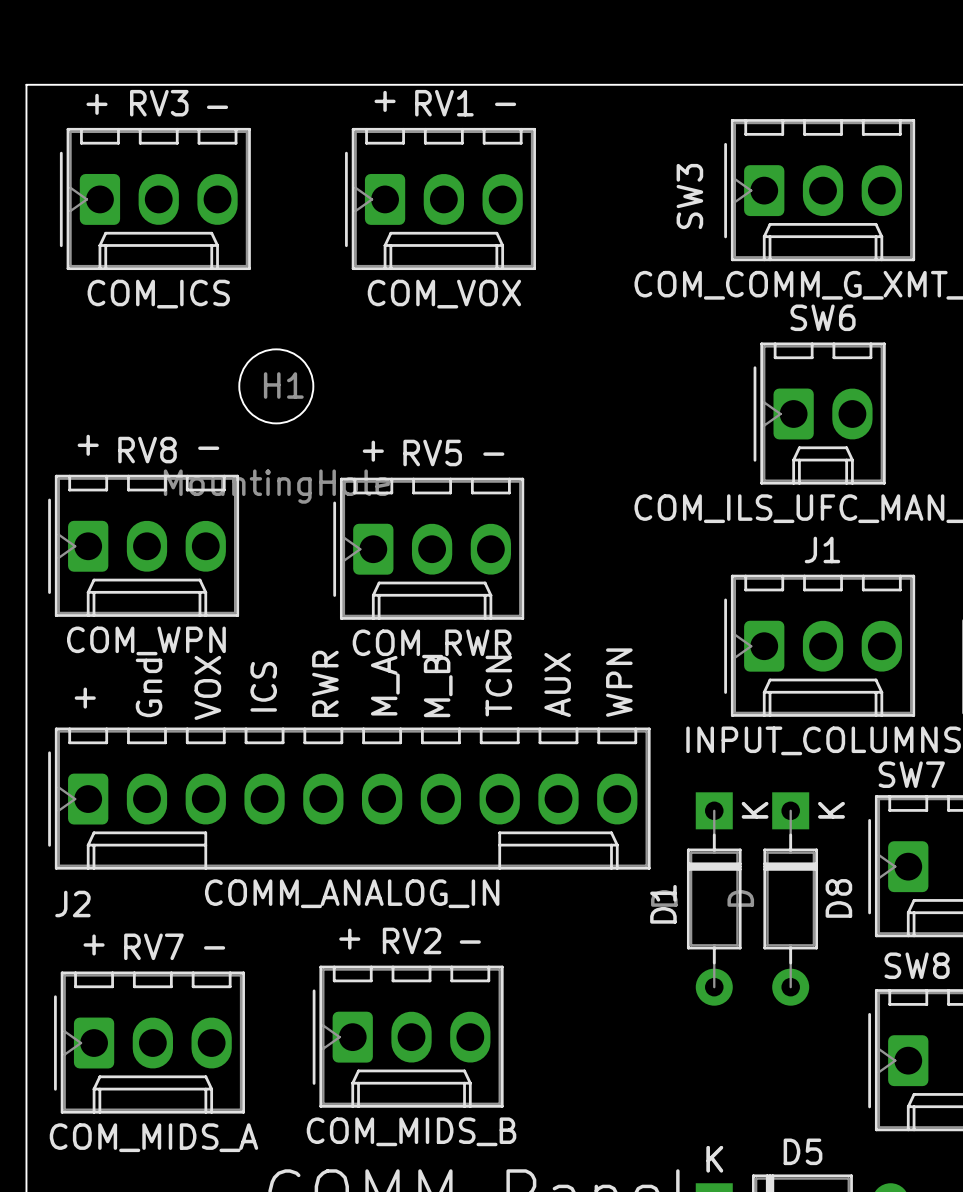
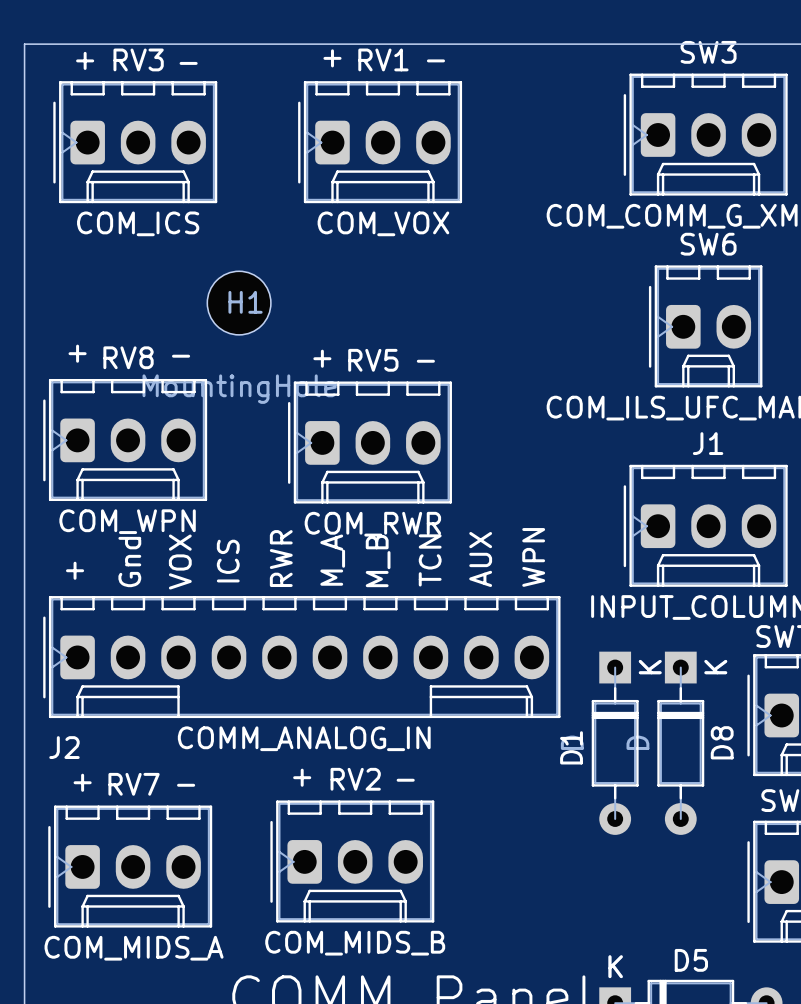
SW3 name rotation: 0° (689, 196) -> 90° clockwise (708, 52)
SW3 name position: SW3 (689, 196) -> SW3 (708, 52)

